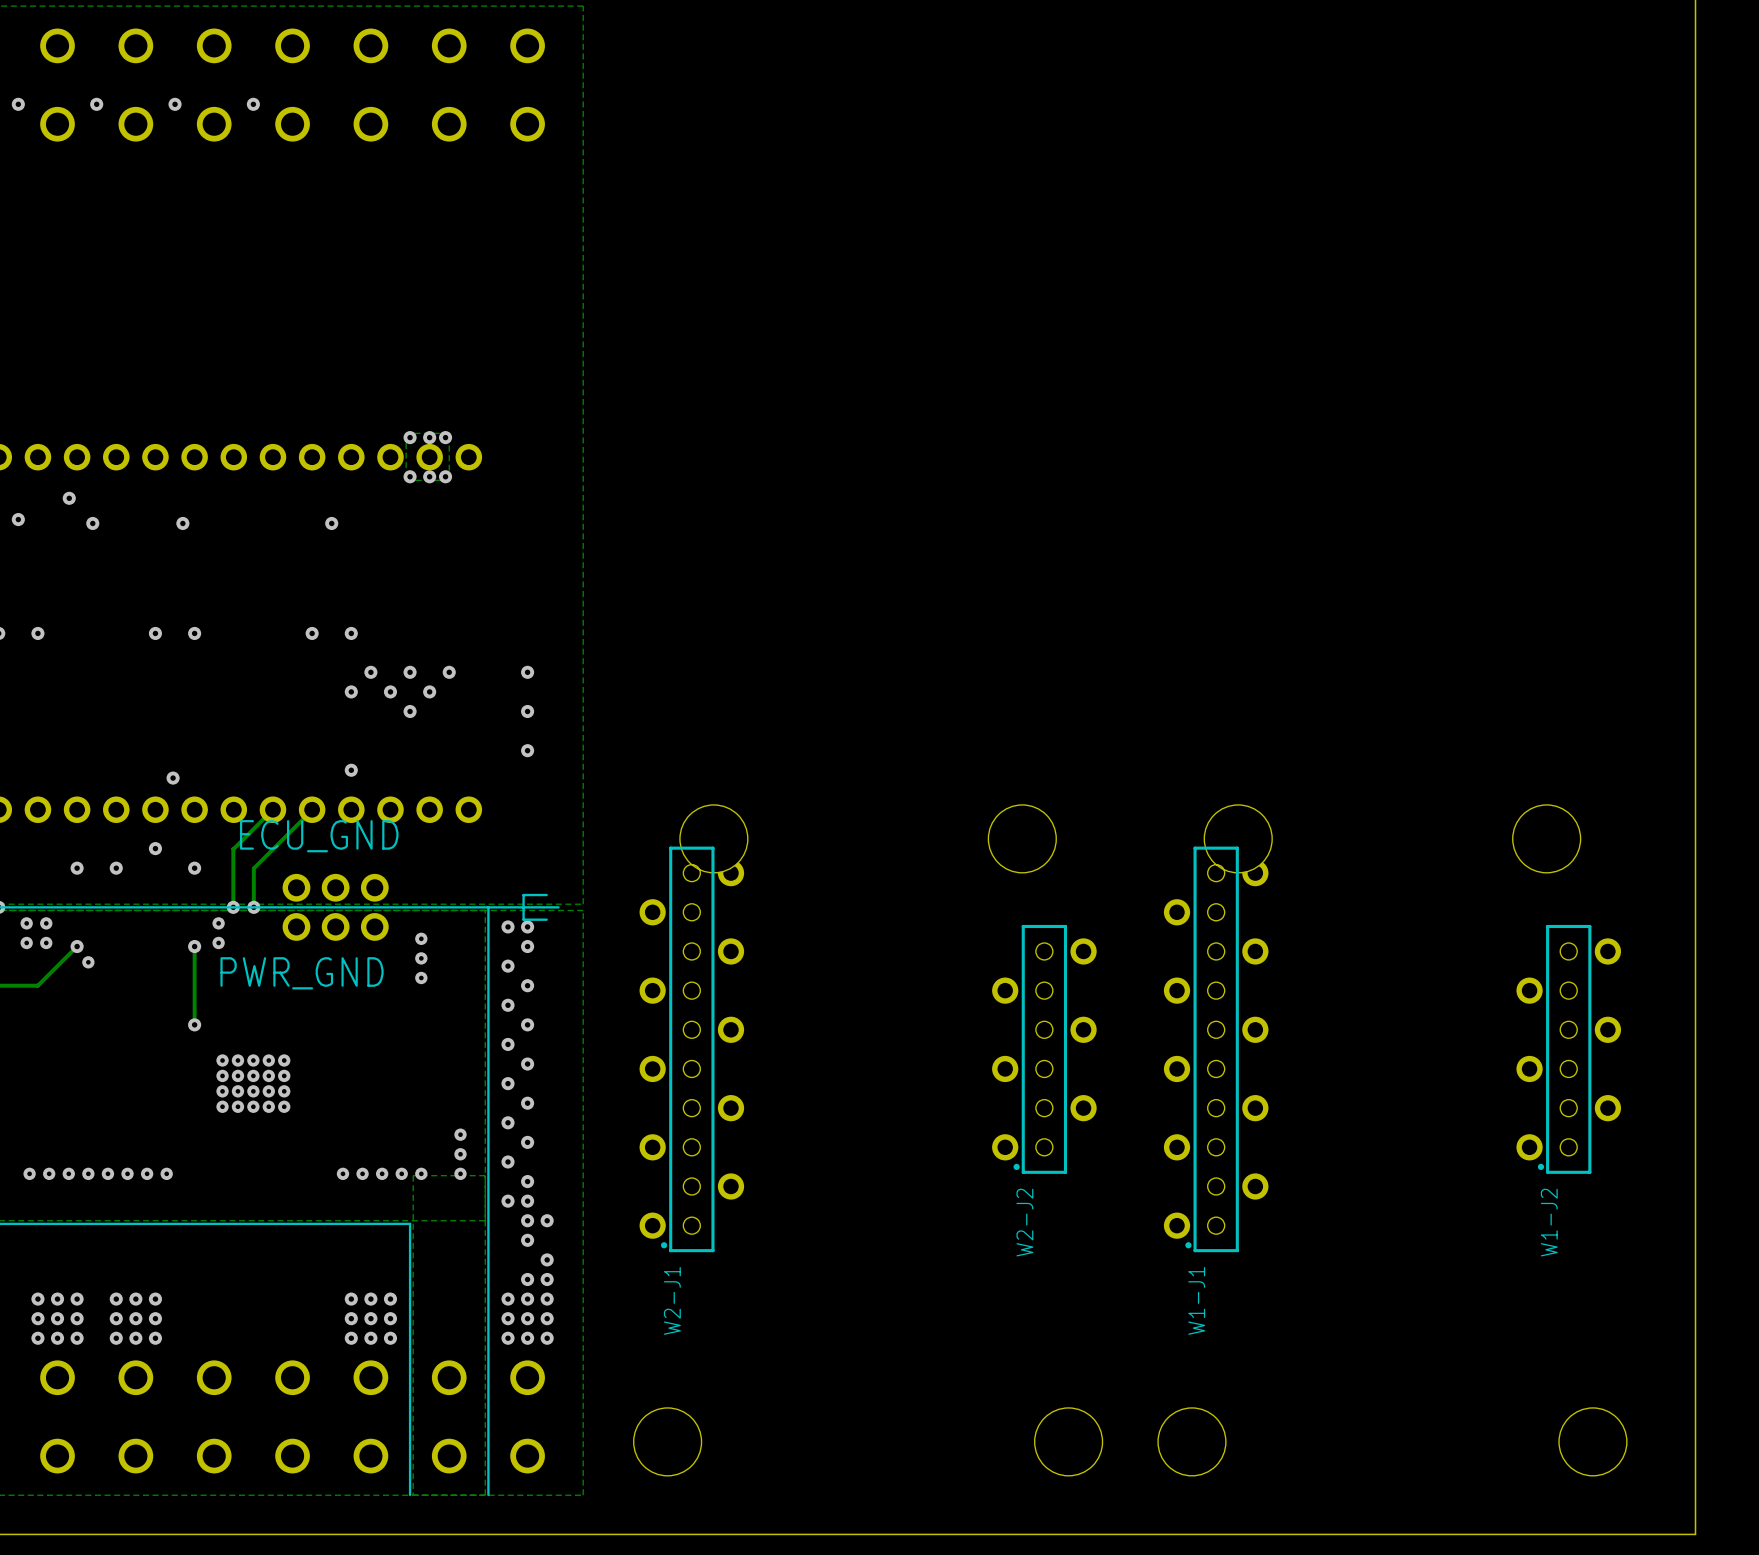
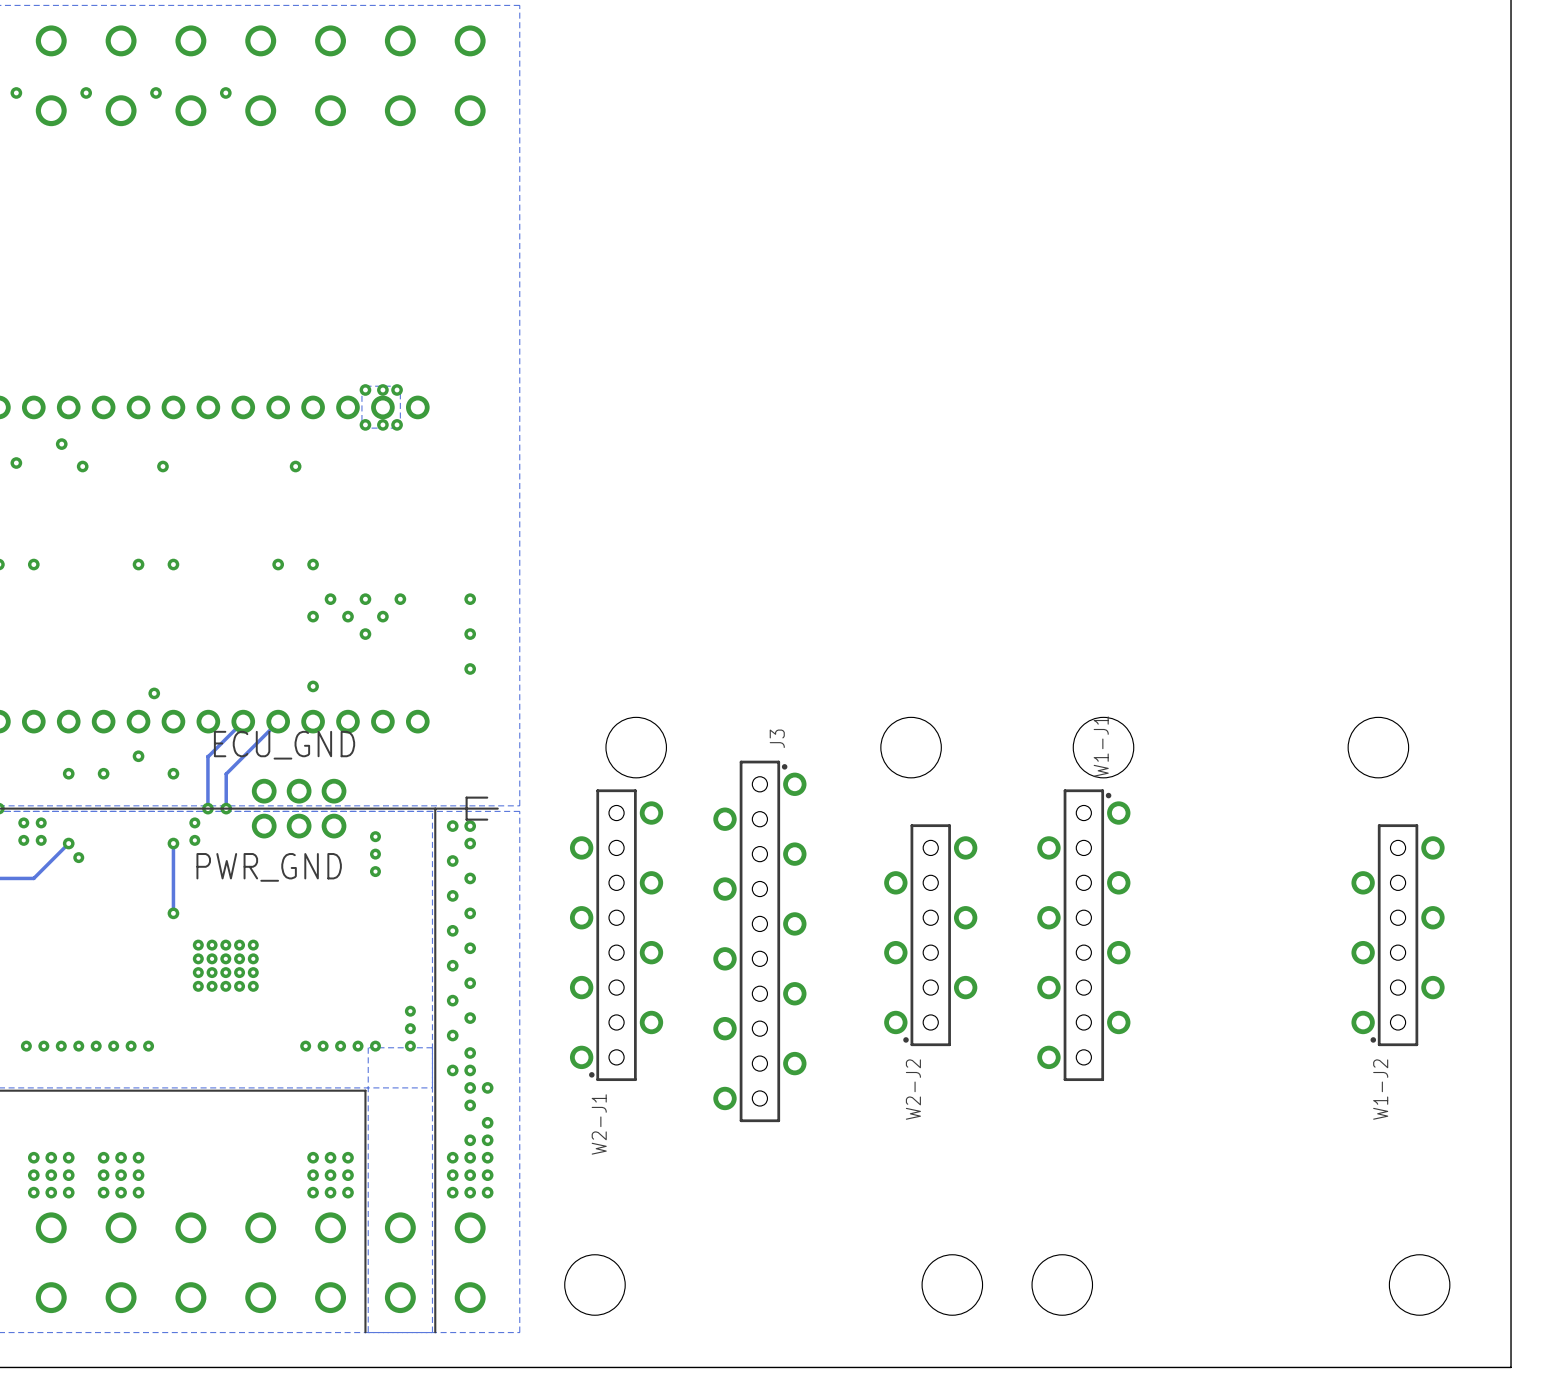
W2-J1 footprint: [639, 846, 745, 1253] -> [569, 789, 664, 1082]
W1-J1 footprint: [1163, 846, 1269, 1253] -> [1037, 789, 1131, 1082]
J3: none -> (759, 941)
W2-J1 name position: W2-J1 (672, 1300) -> W2-J1 (599, 1124)
W1-J1 name position: W1-J1 (1196, 1300) -> W1-J1 (1101, 746)

